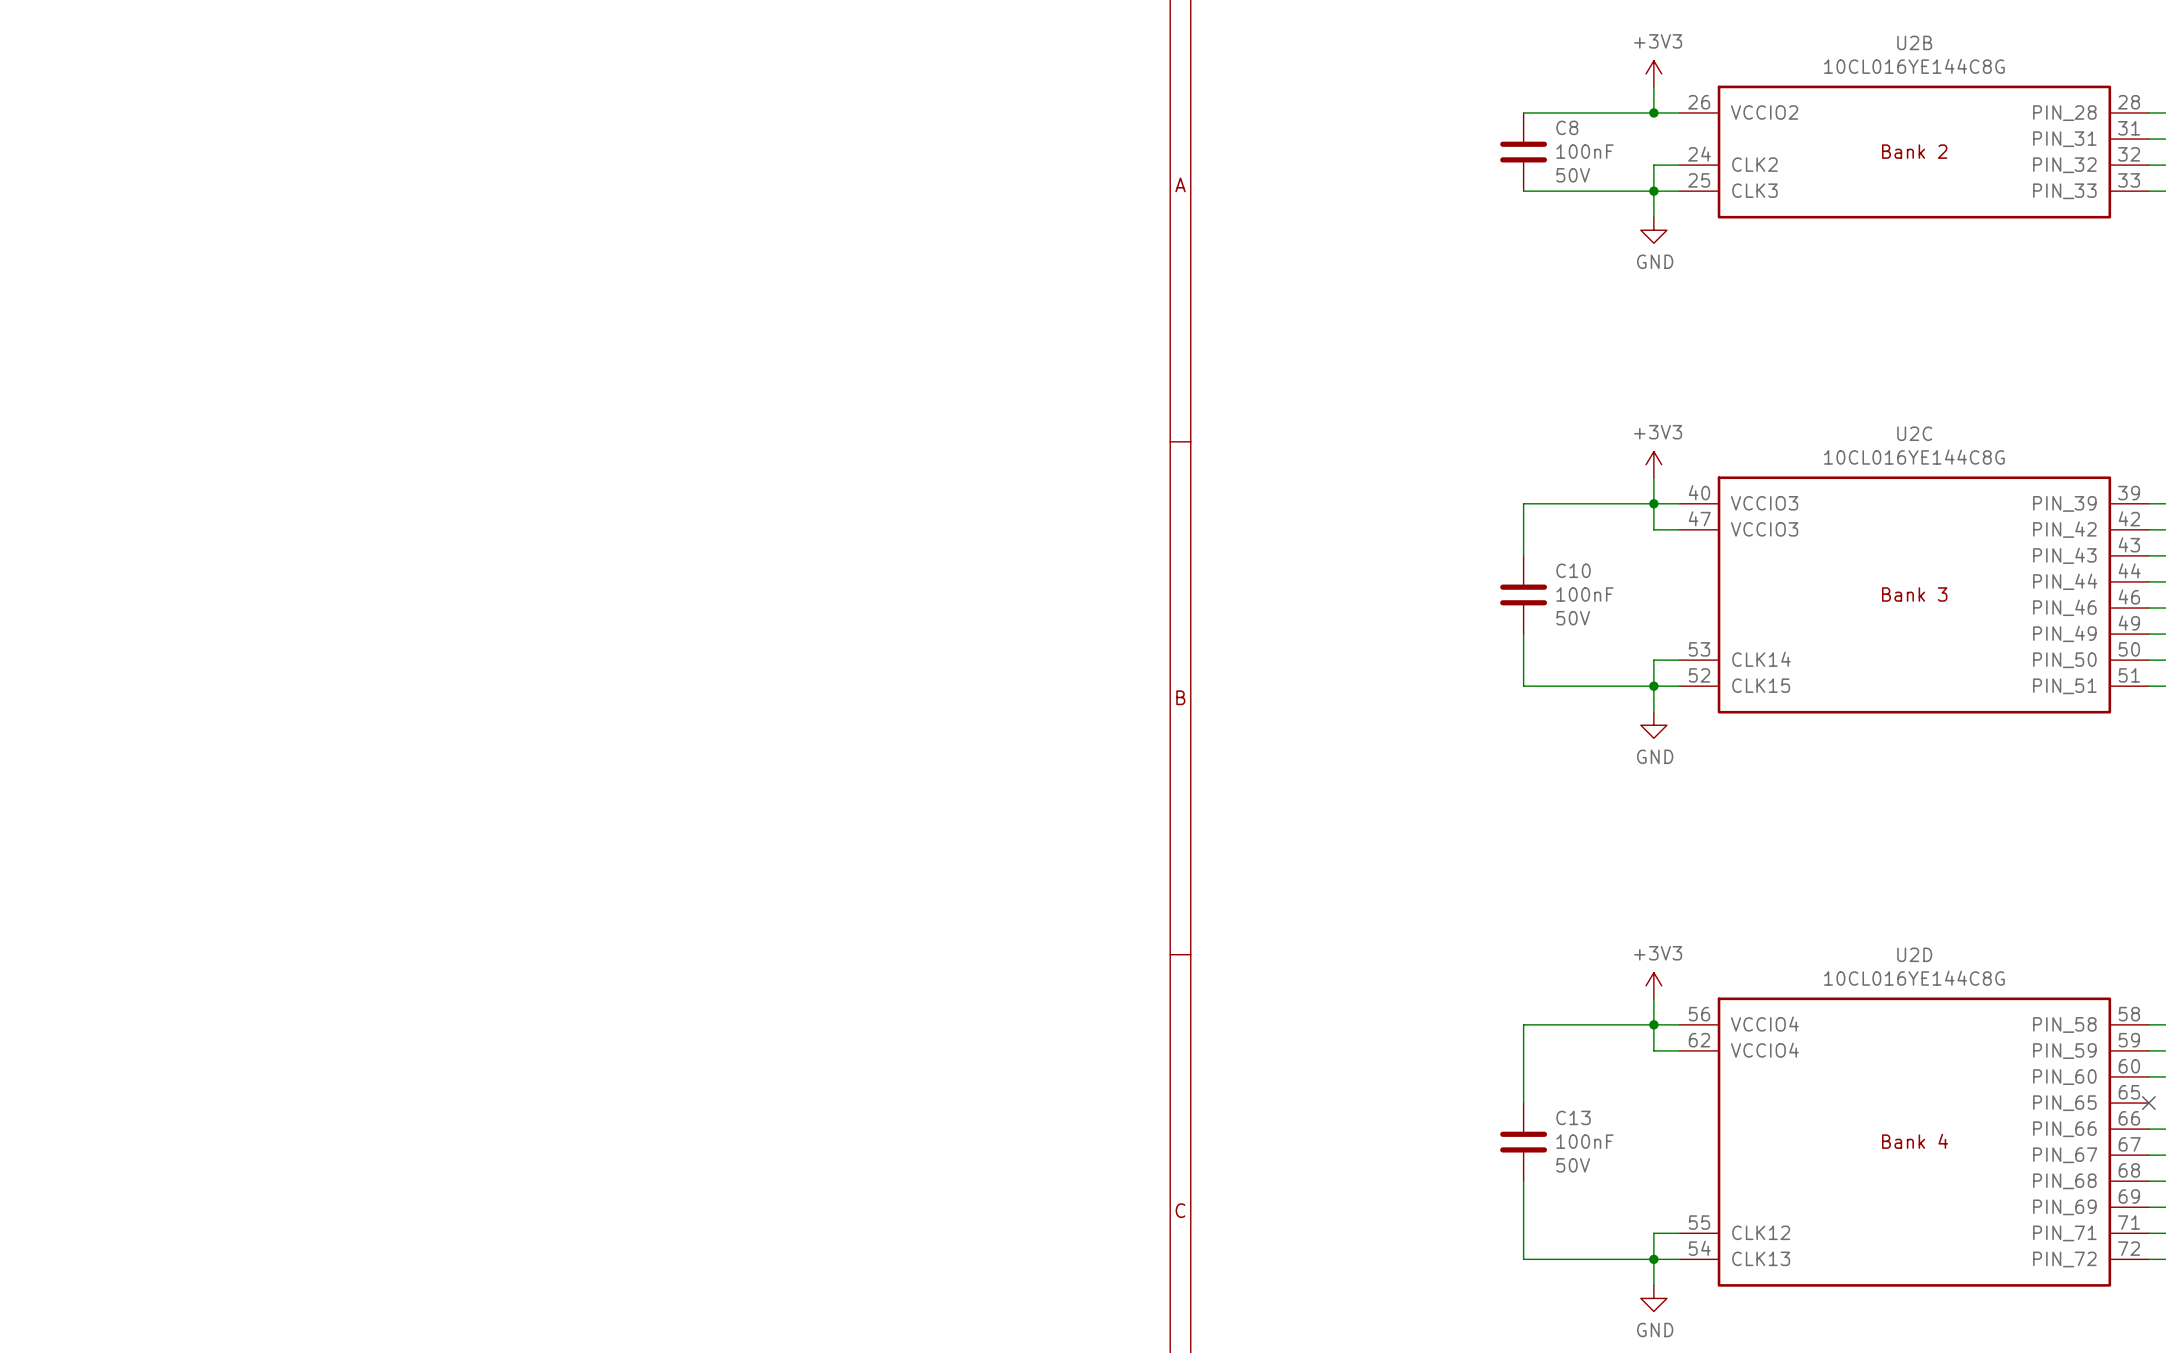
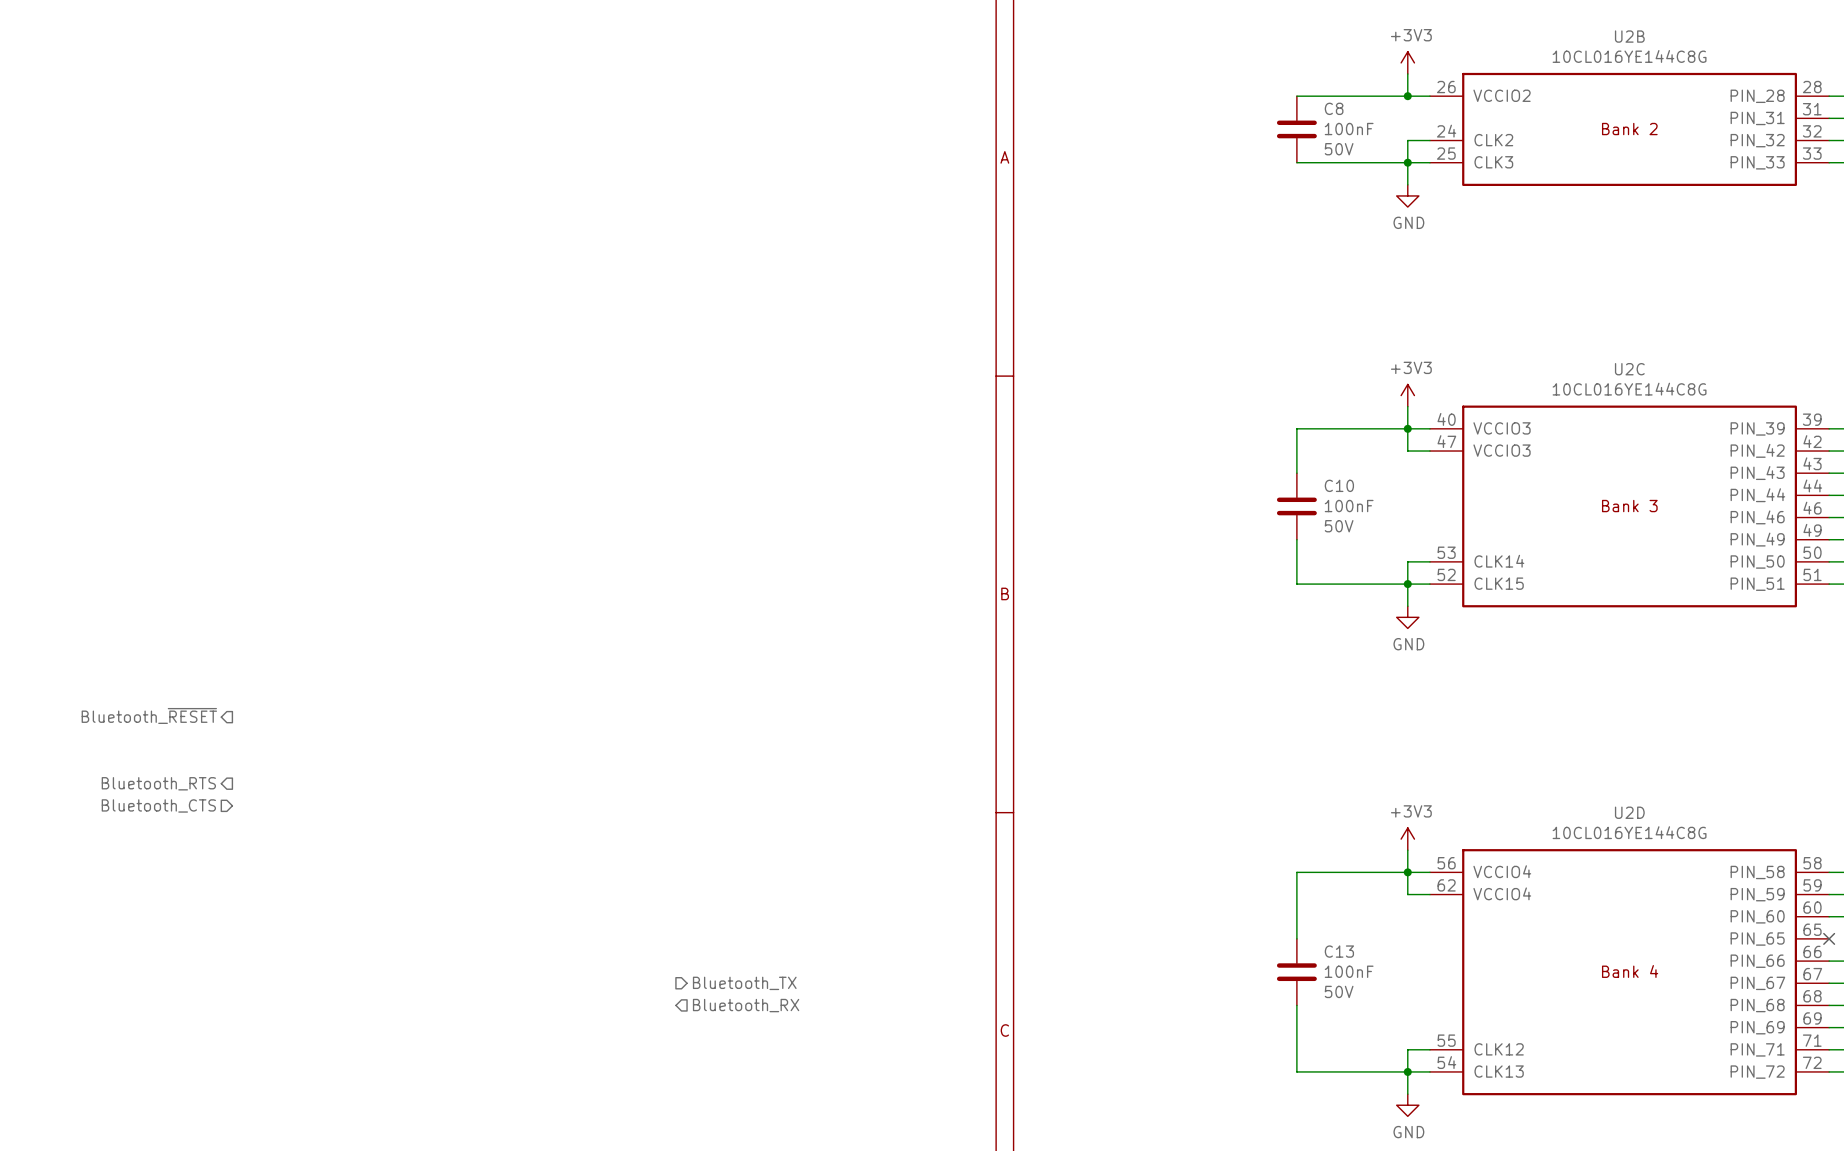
hierarchical label: none -> Bluetooth_~{RESET} (149, 715)
hierarchical label: none -> Bluetooth_RTS (158, 783)
hierarchical label: none -> Bluetooth_CTS (158, 805)
hierarchical label: none -> Bluetooth_TX (744, 983)
hierarchical label: none -> Bluetooth_RX (746, 1005)

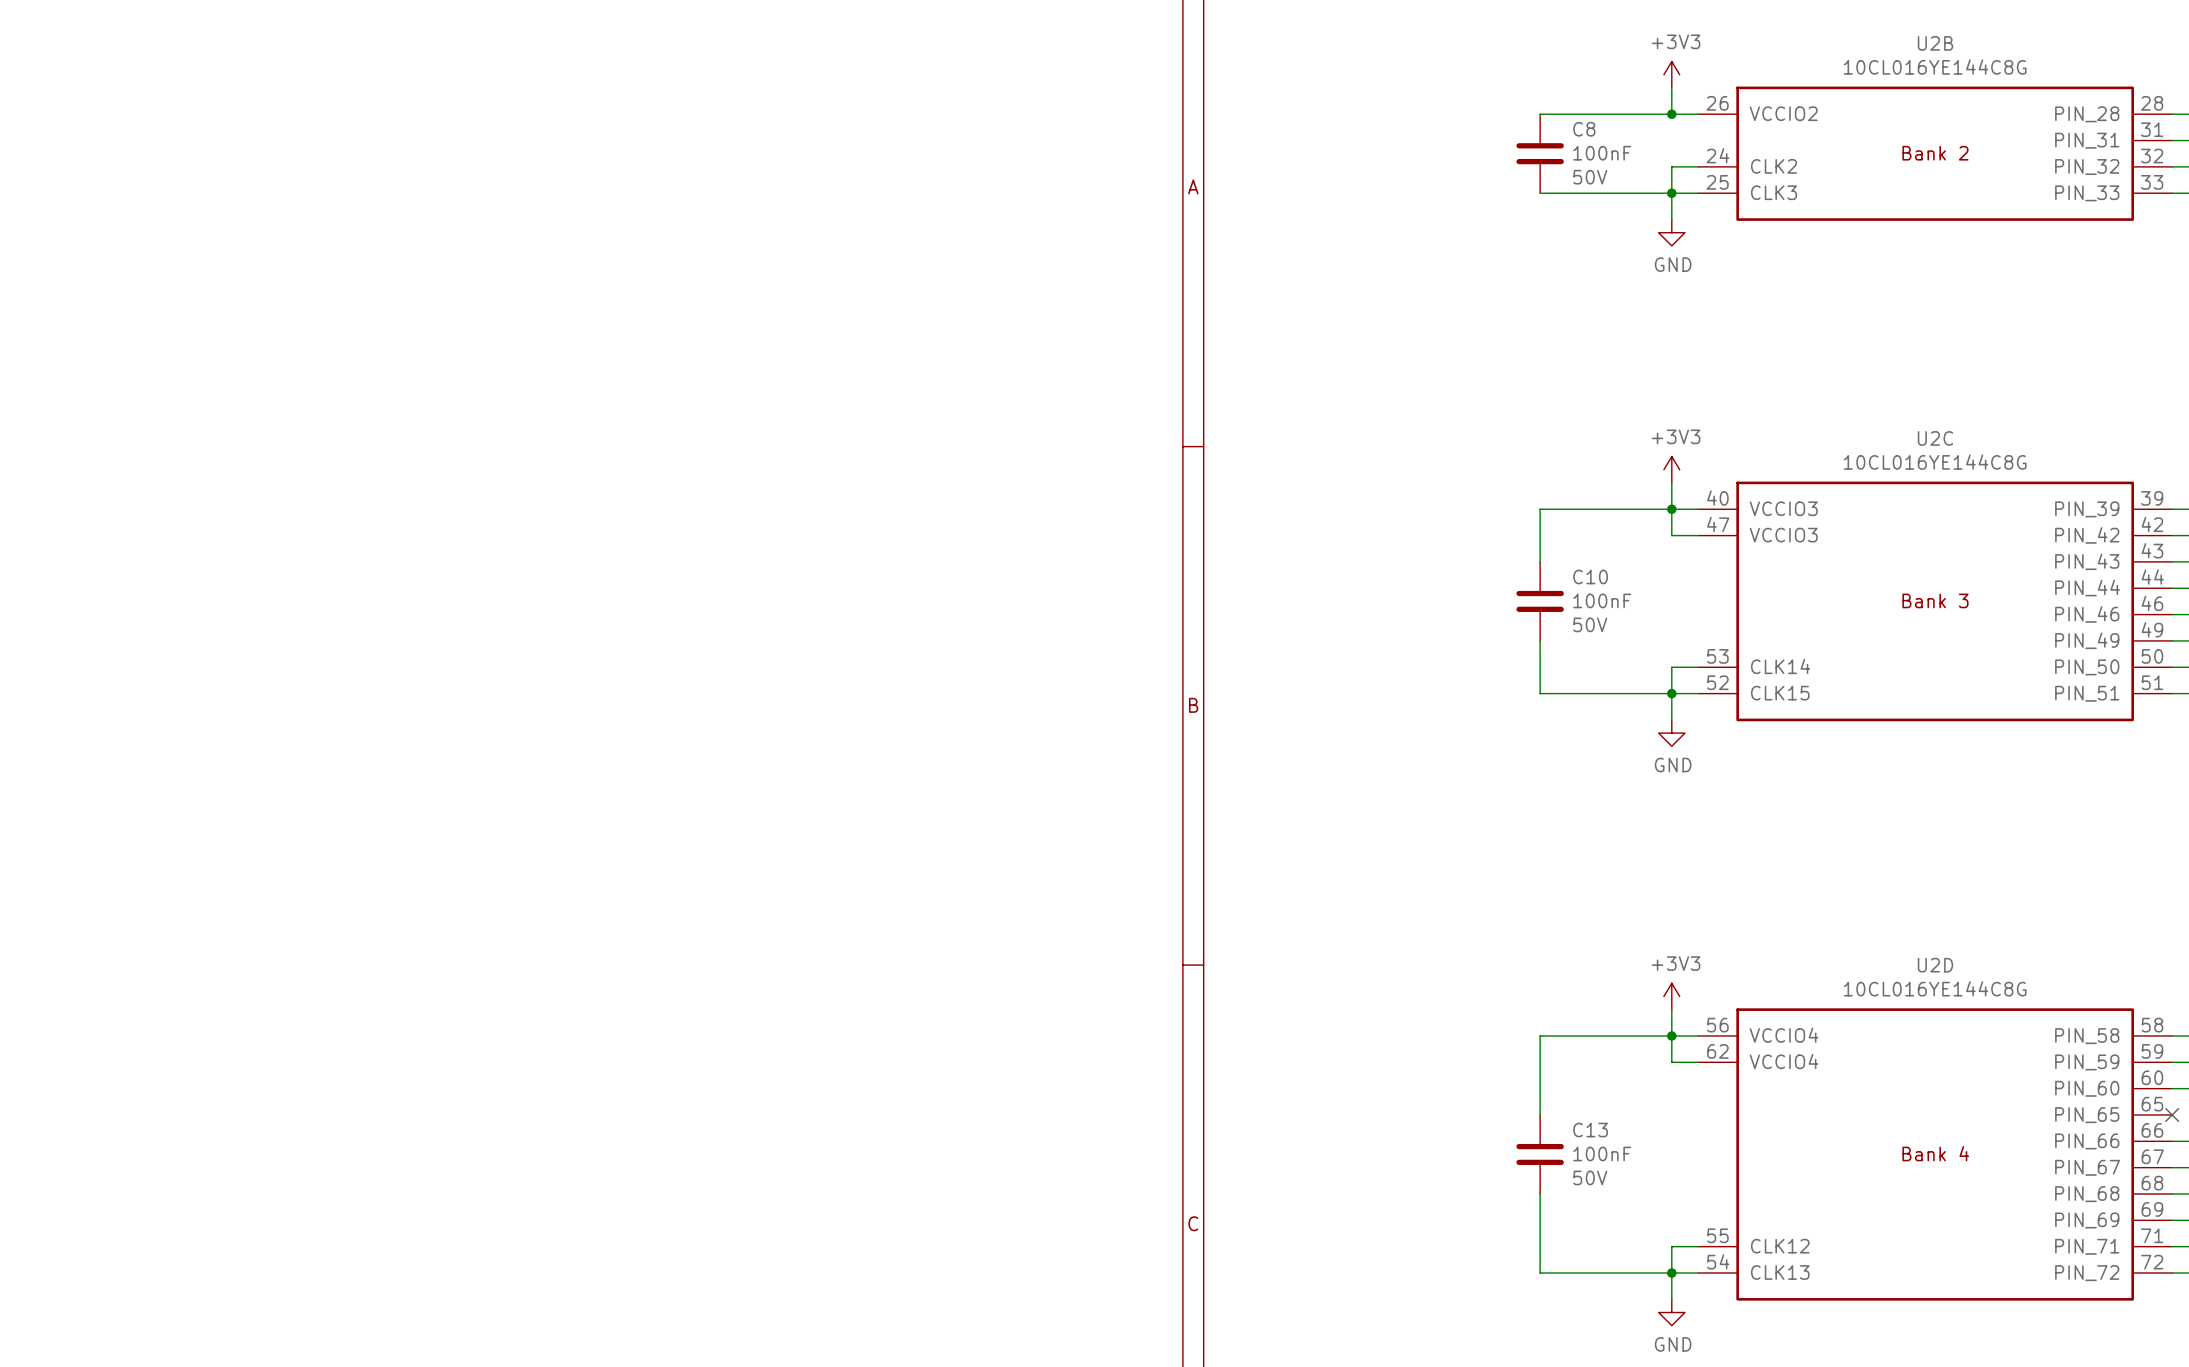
hierarchical label: Bluetooth_~{RESET} (149, 715) -> none
hierarchical label: Bluetooth_RTS (158, 783) -> none
hierarchical label: Bluetooth_CTS (158, 805) -> none
hierarchical label: Bluetooth_TX (744, 983) -> none
hierarchical label: Bluetooth_RX (746, 1005) -> none

